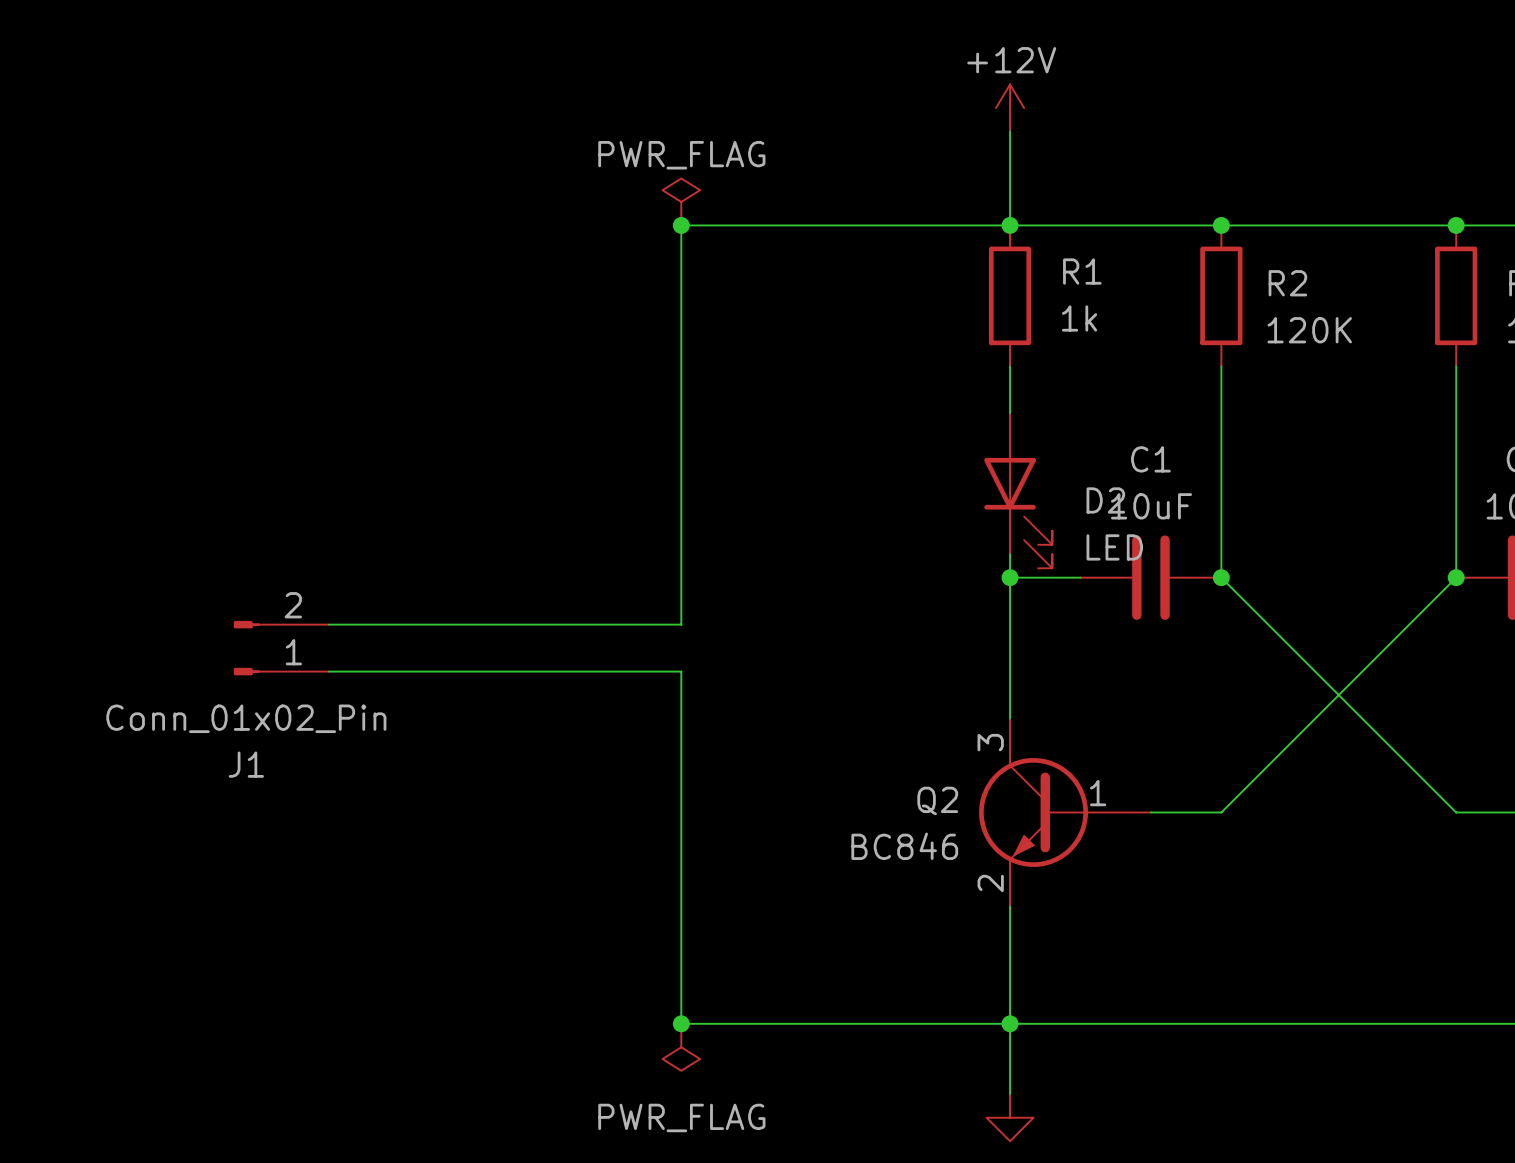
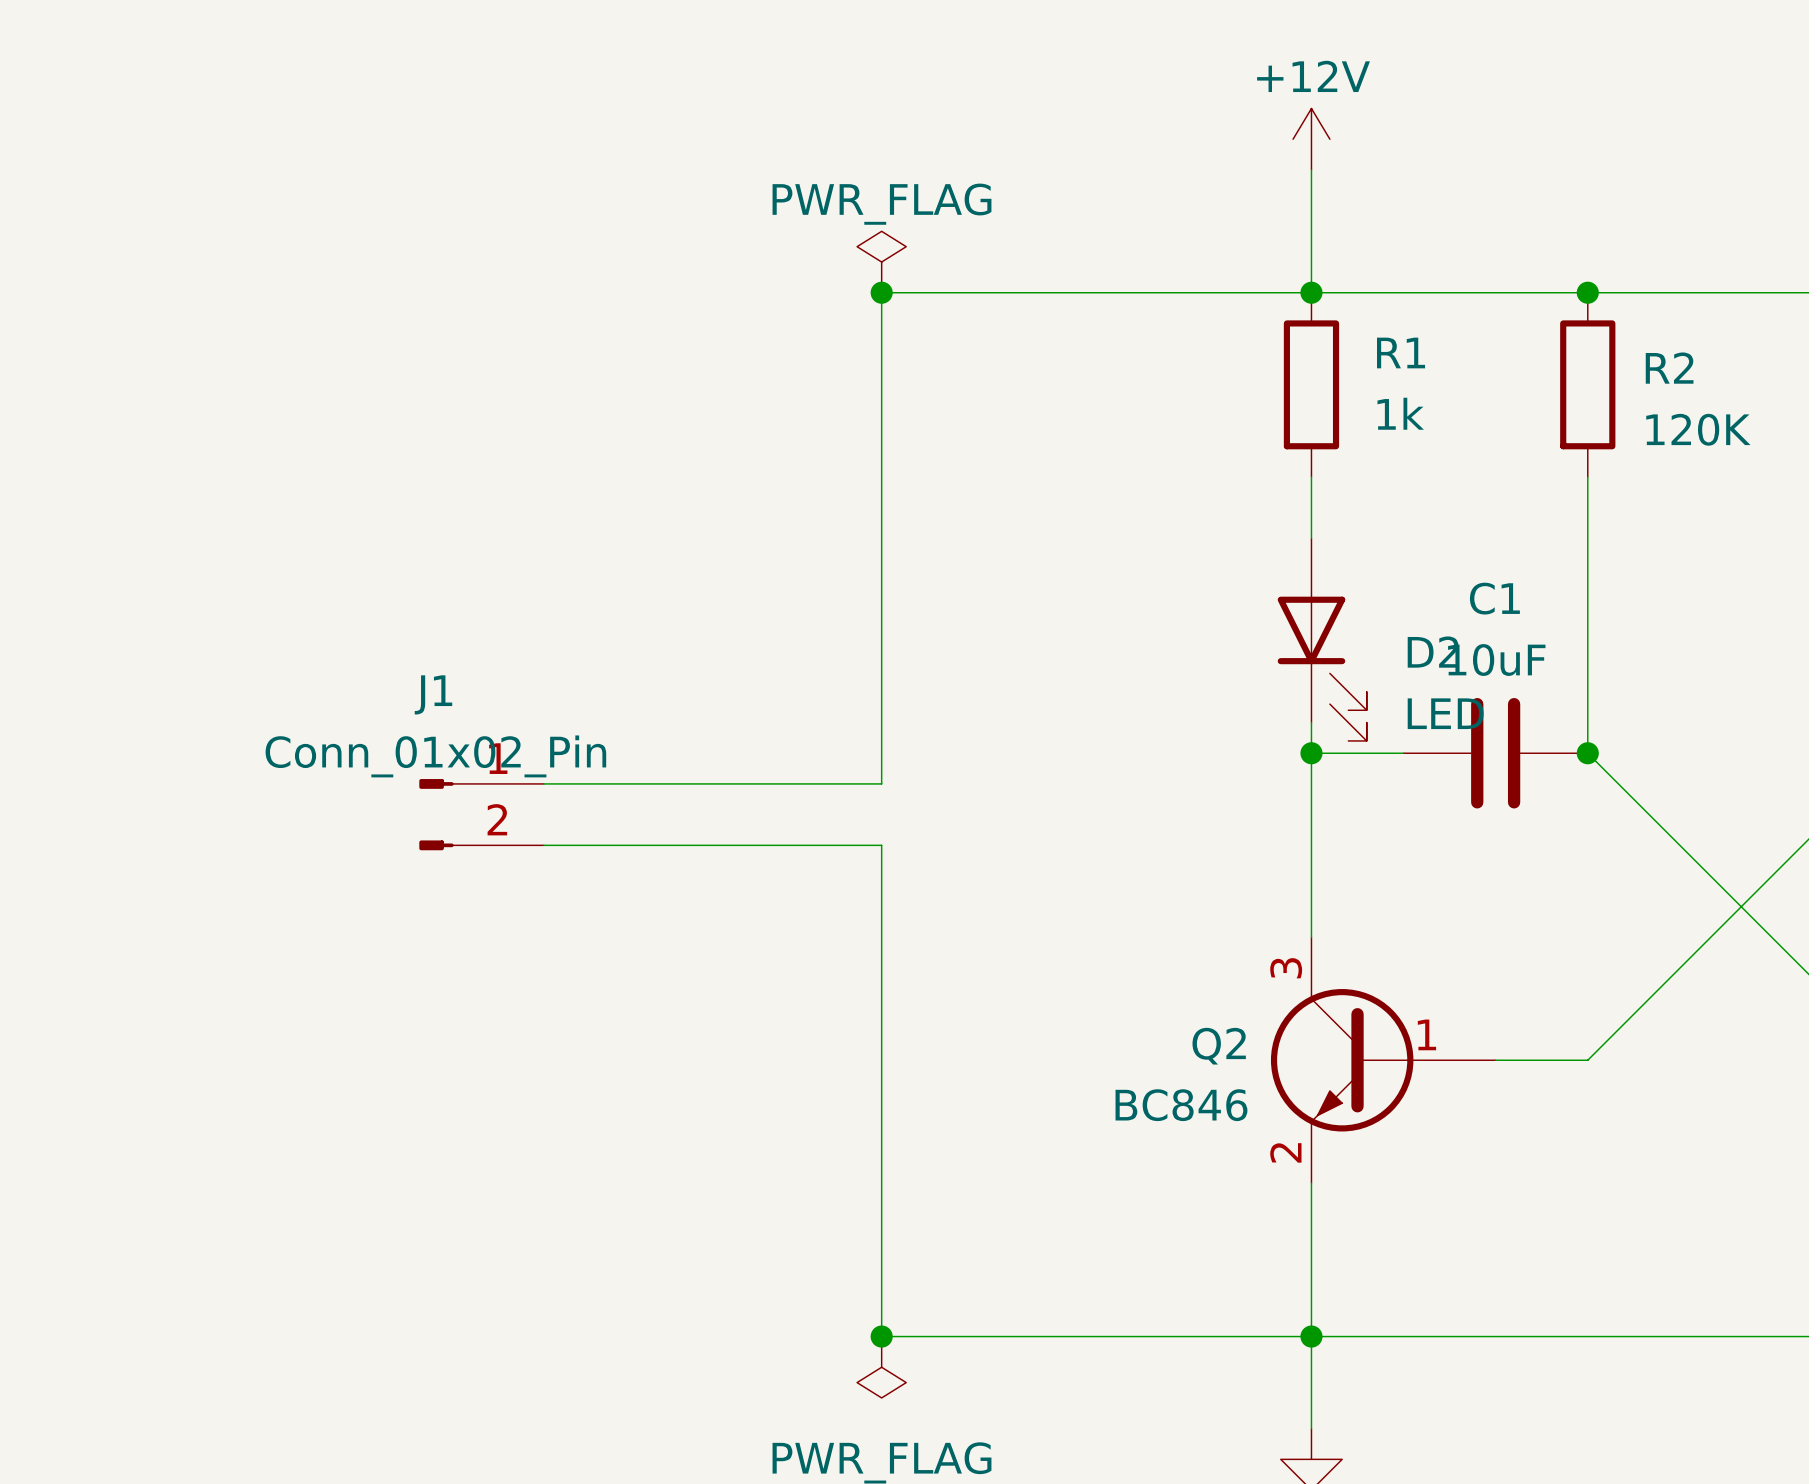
wire: (681, 601) (681, 624) (329, 624) -> (881, 783) (543, 783)
J1 flip: as is (246, 648) -> up-down (436, 814)
J1 position: (281, 648) -> (481, 814)
wire: (329, 671) (681, 671) -> (543, 845) (881, 845) (881, 876)

